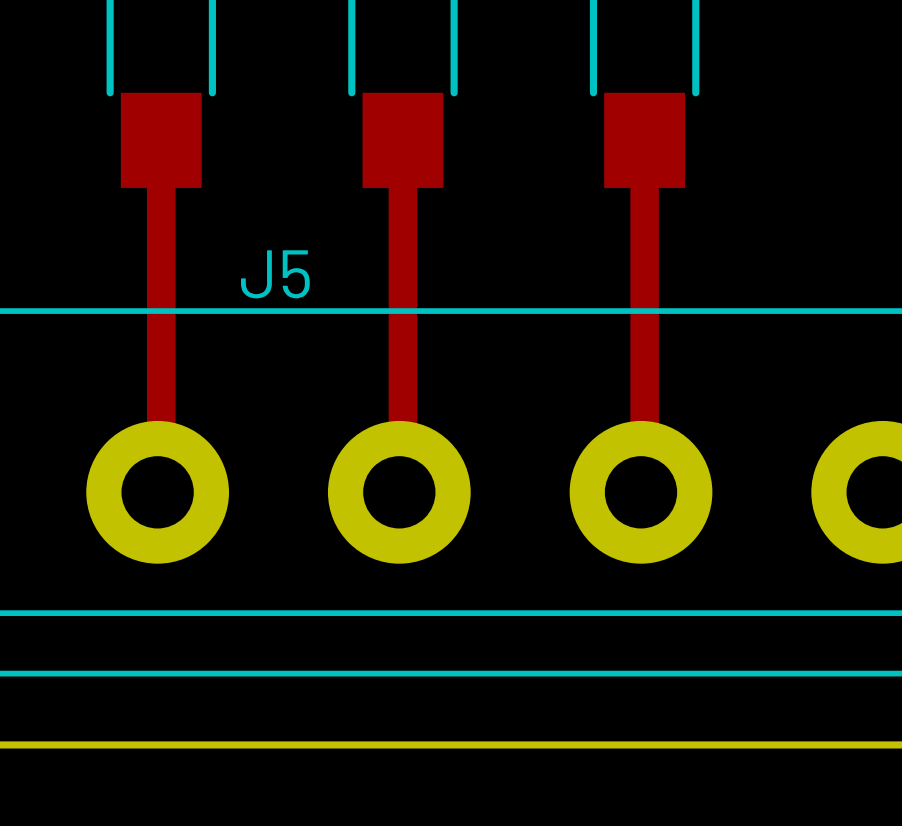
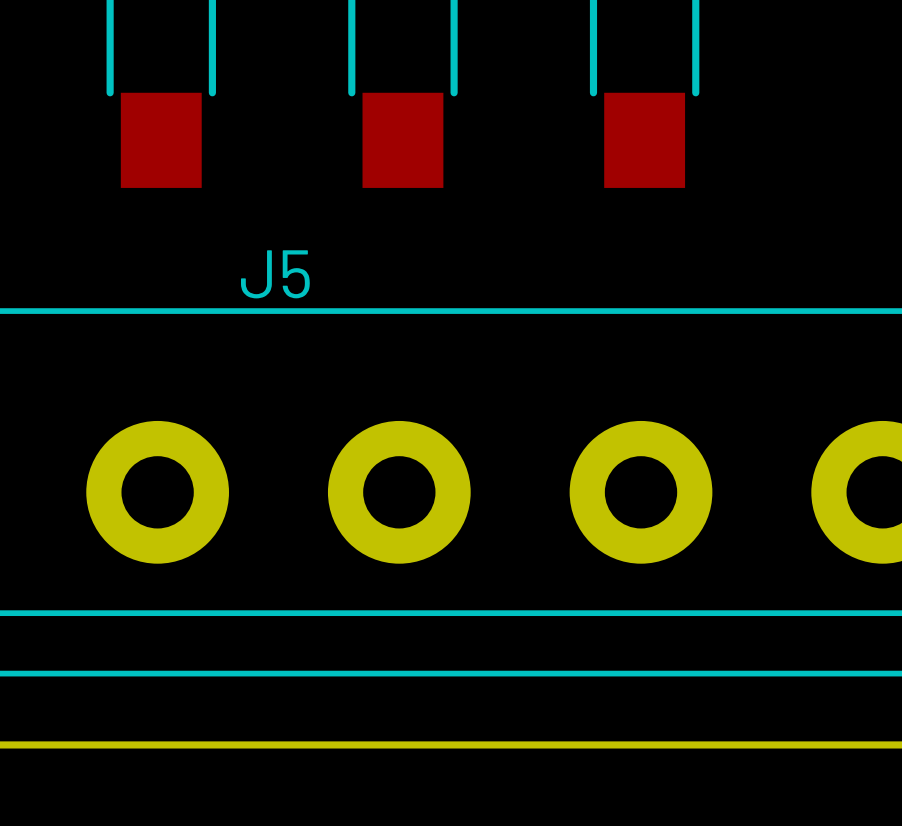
track: (161, 140) (161, 488) (157, 492) -> none
track: (402, 140) (402, 488) (399, 492) -> none
track: (644, 140) (644, 488) (641, 492) -> none

